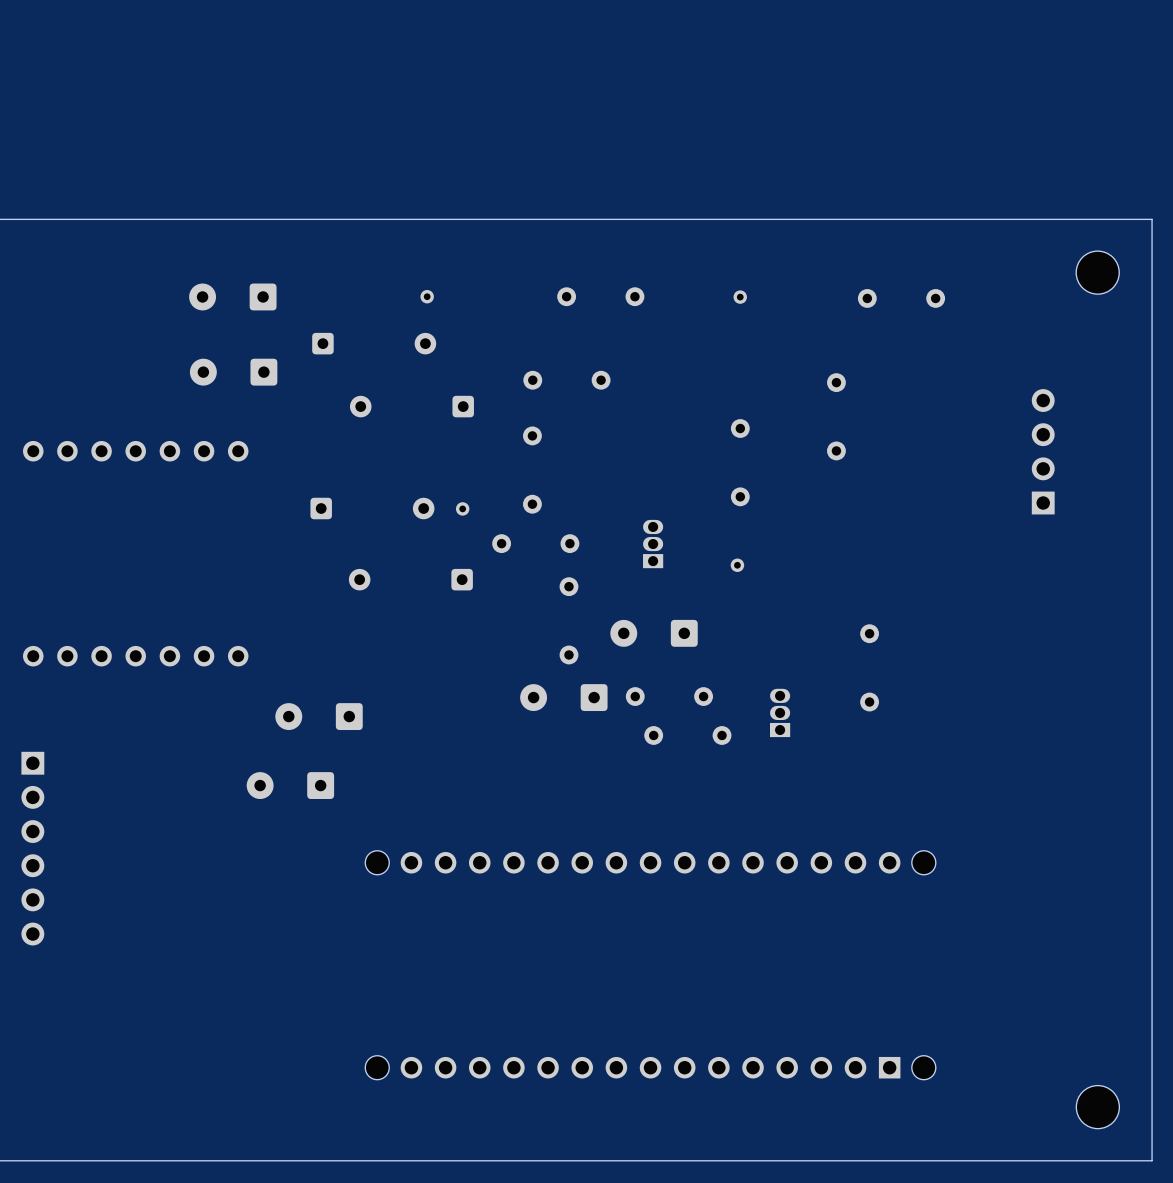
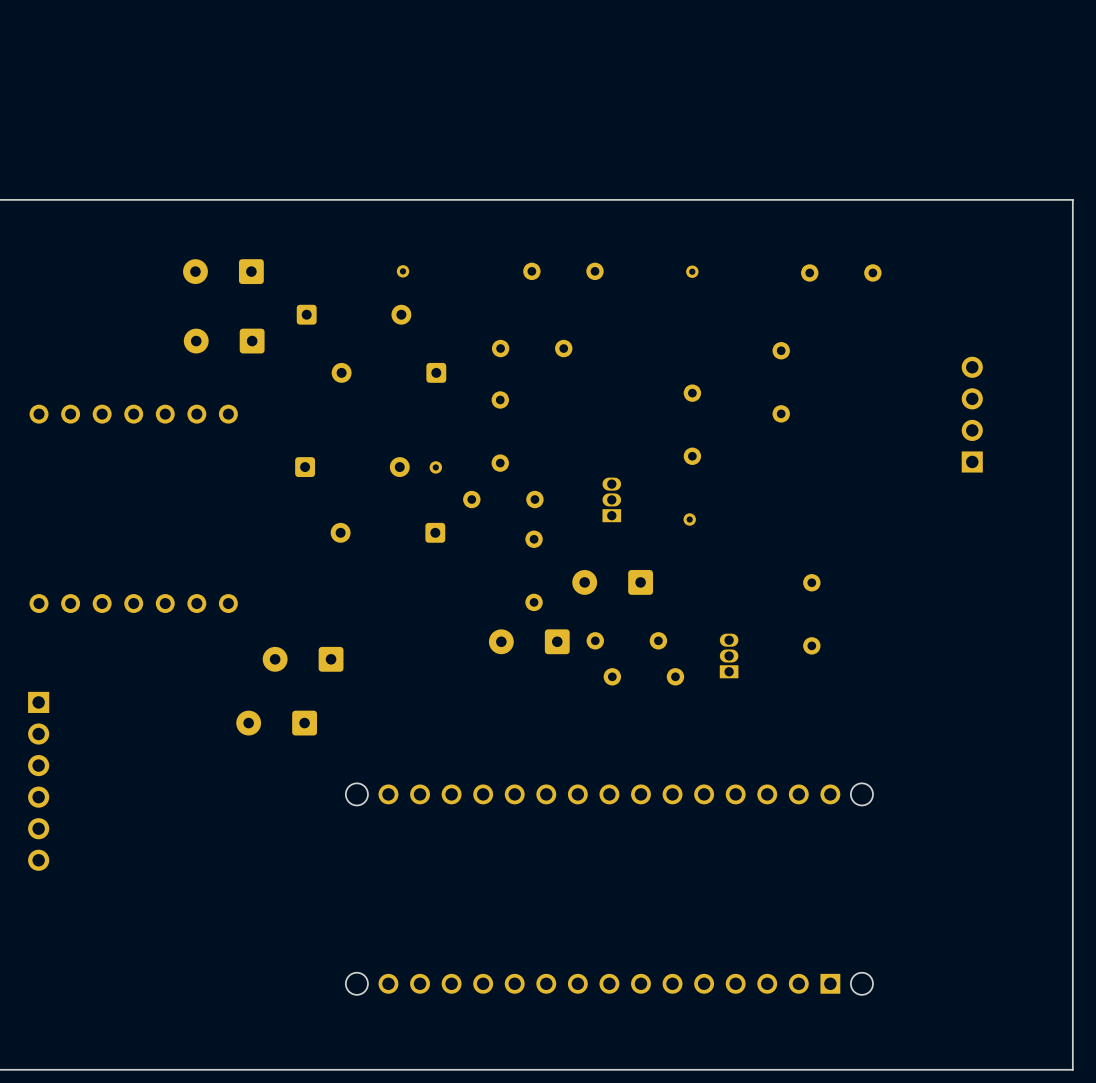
part: (1097, 272) -> none
part: (1097, 1107) -> none

